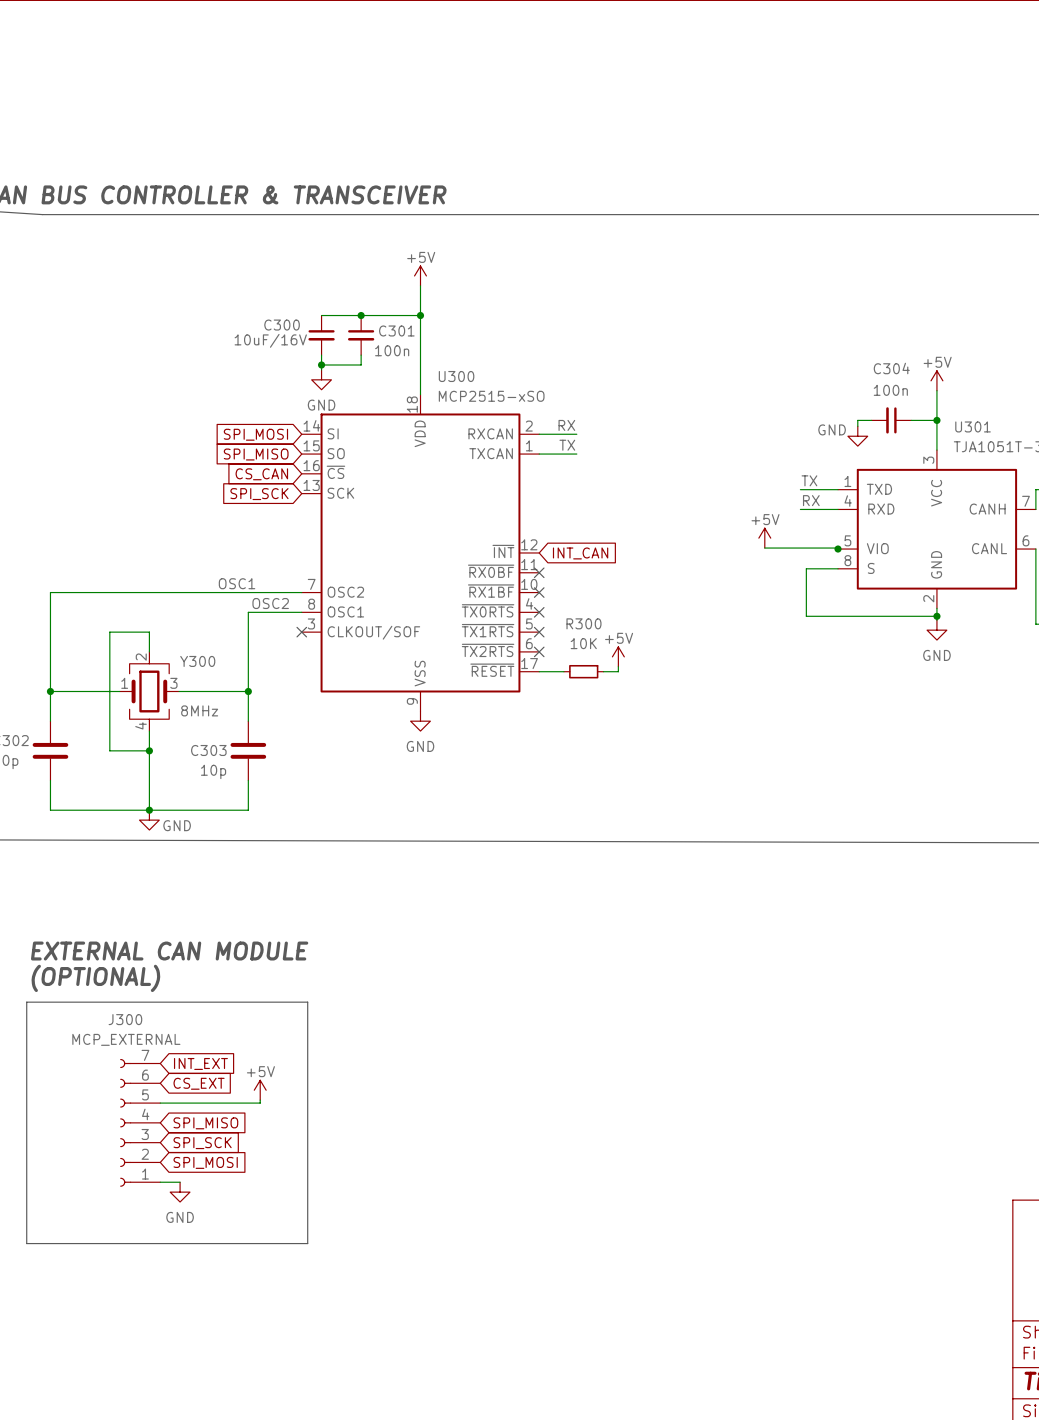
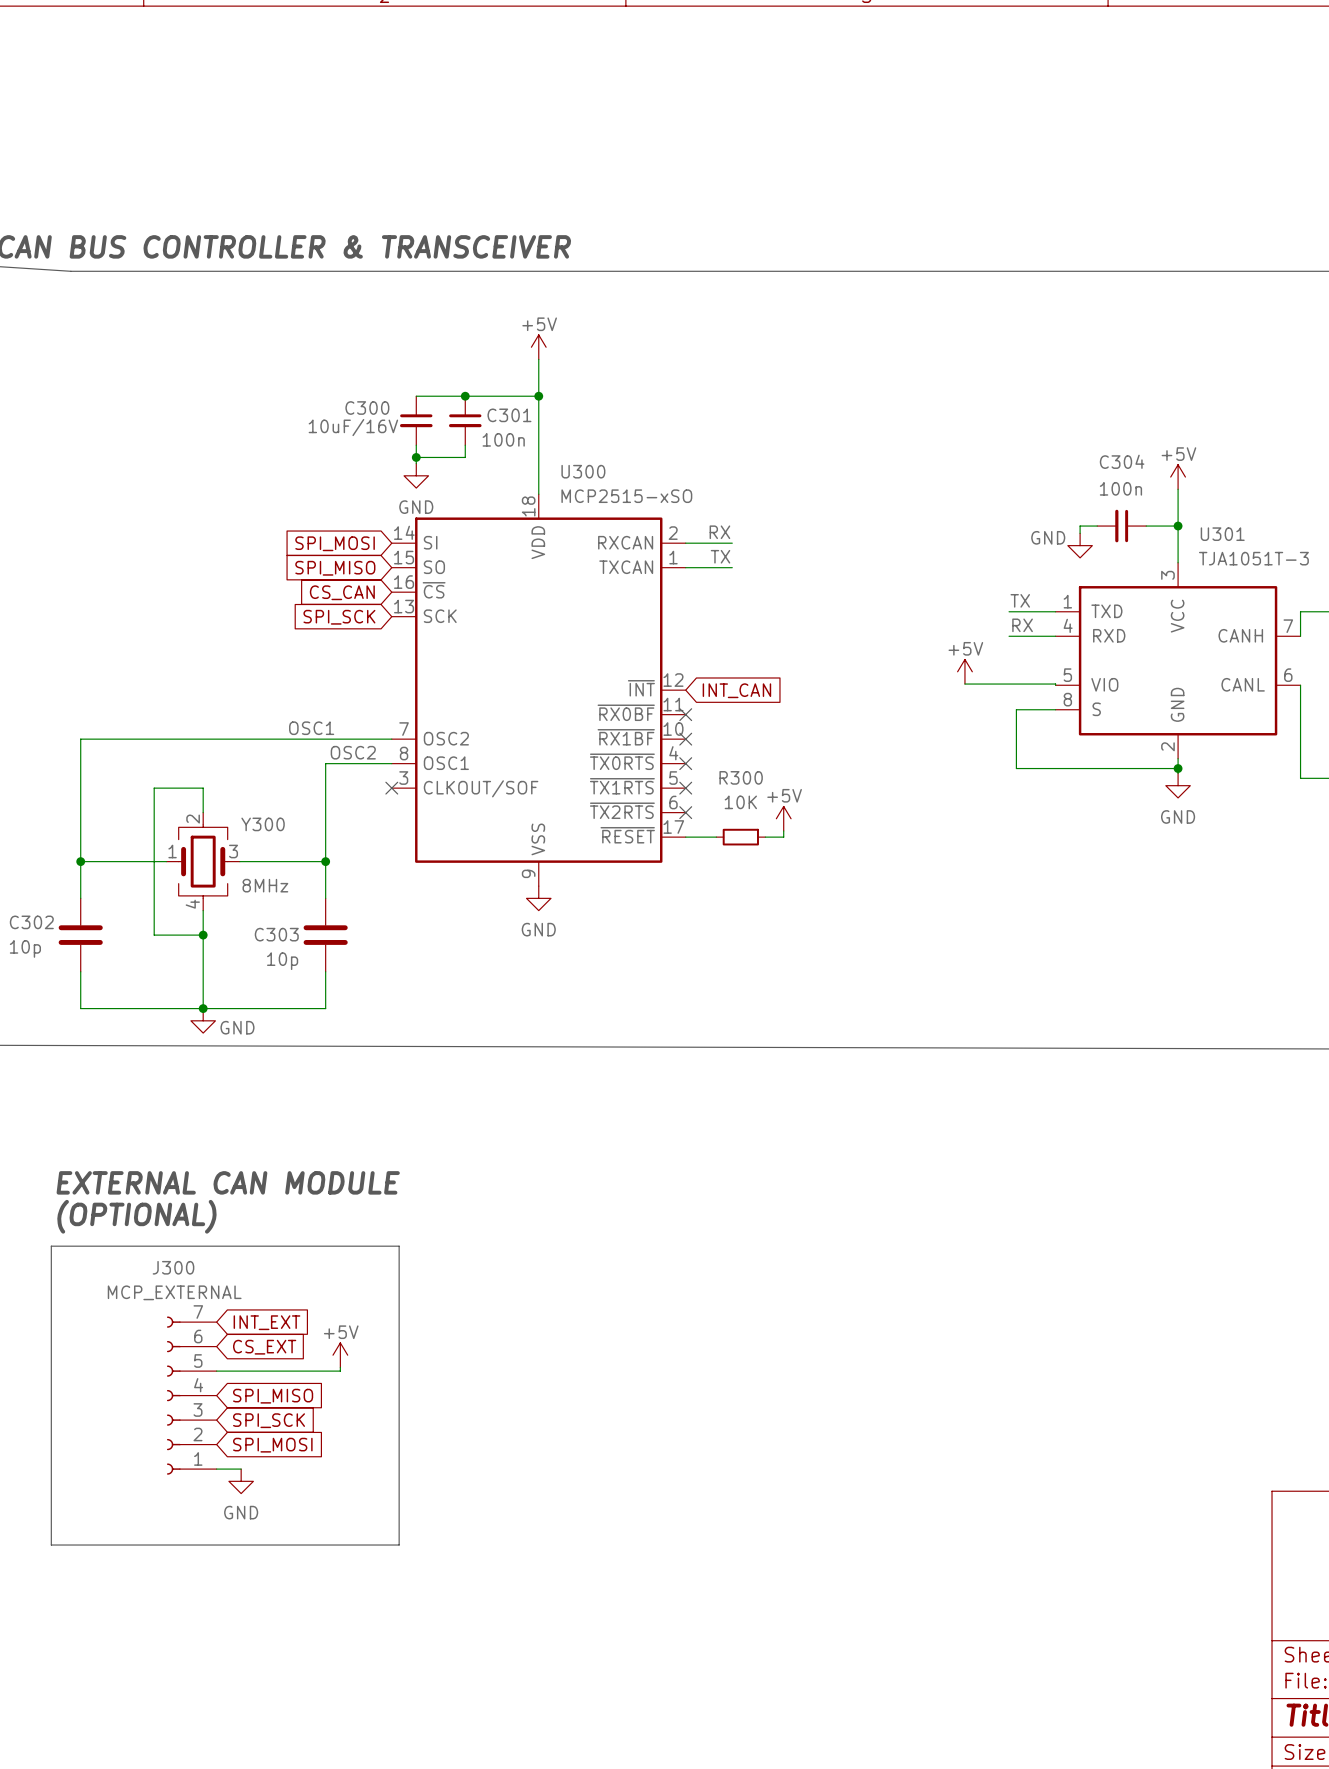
junction: (838, 549) -> none

